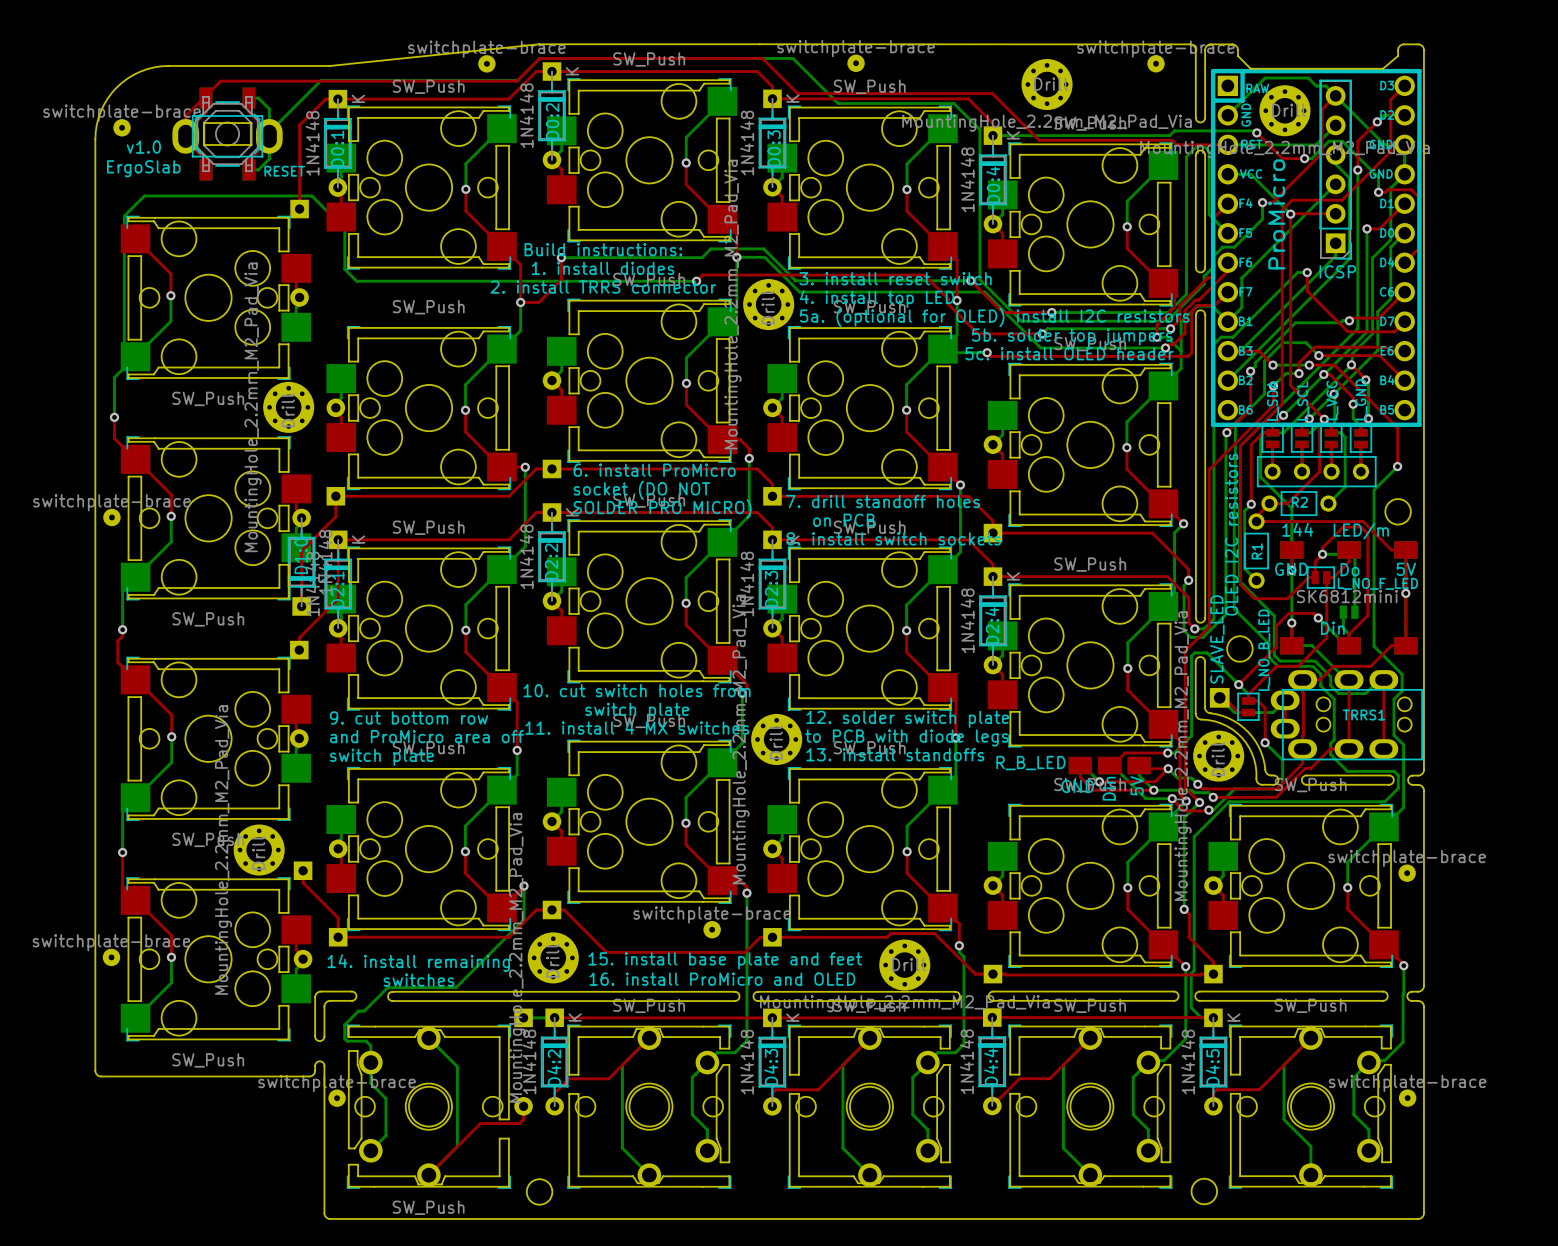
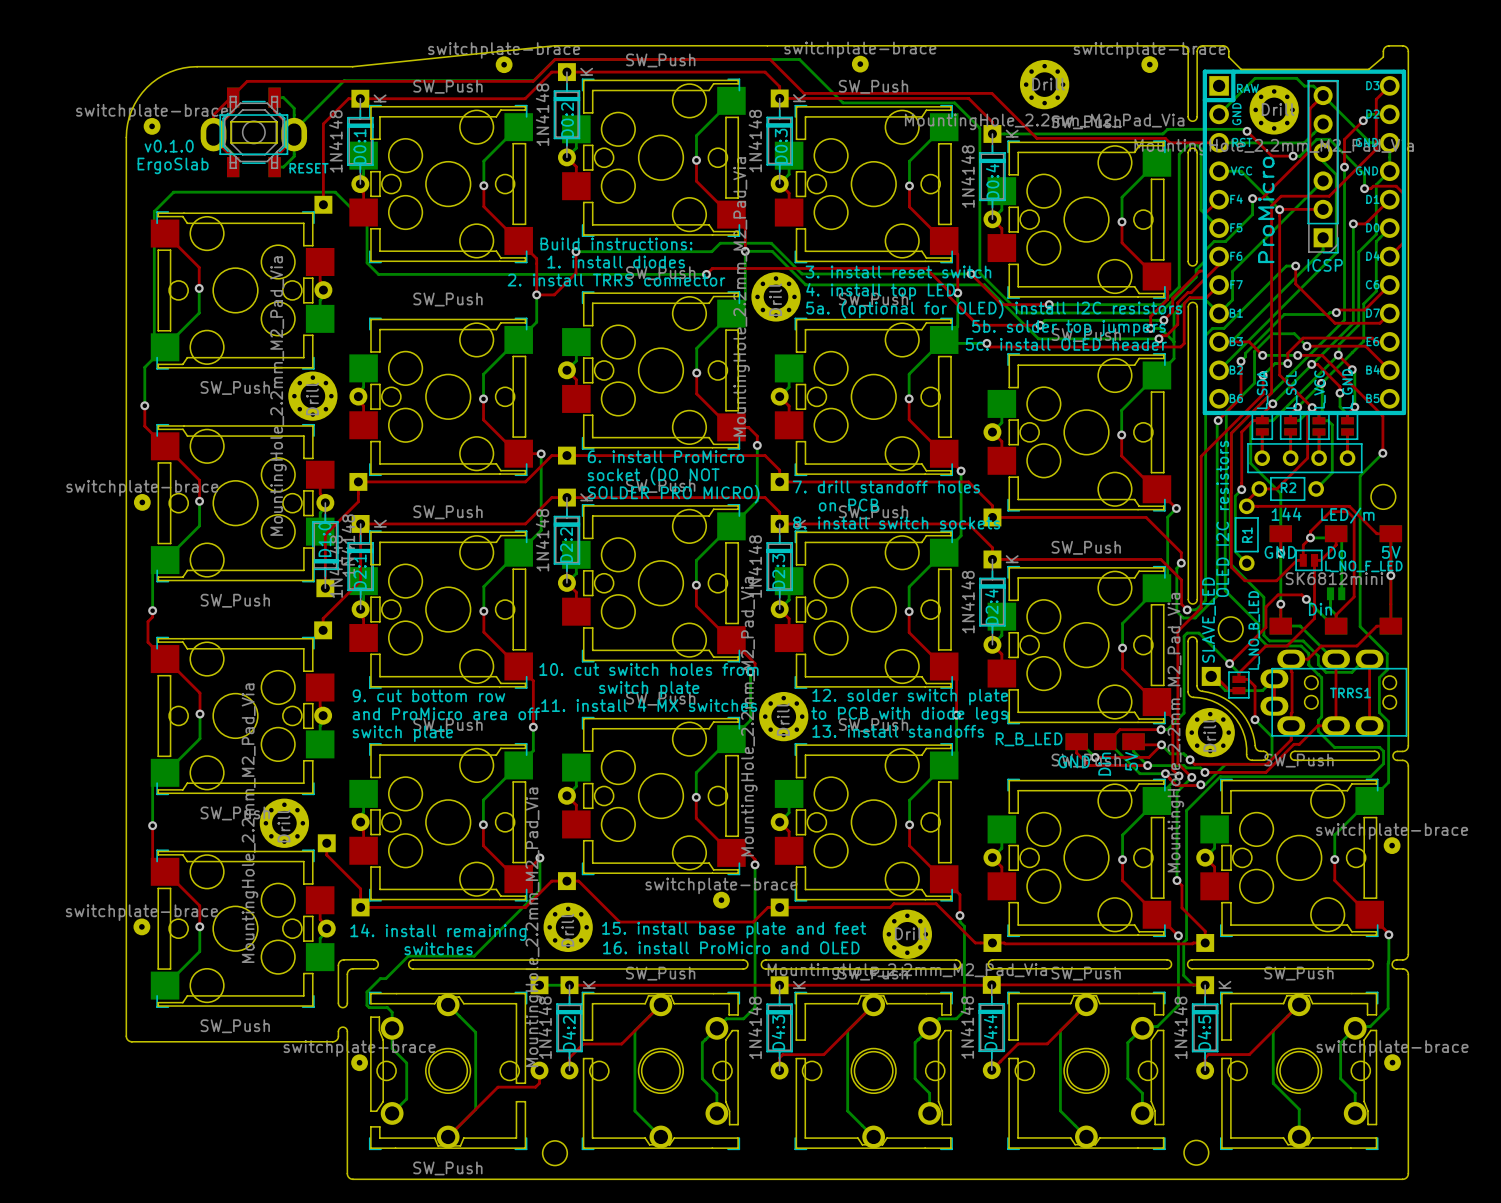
text: v1.0 (143, 147) -> v0.1.0 (169, 146)

